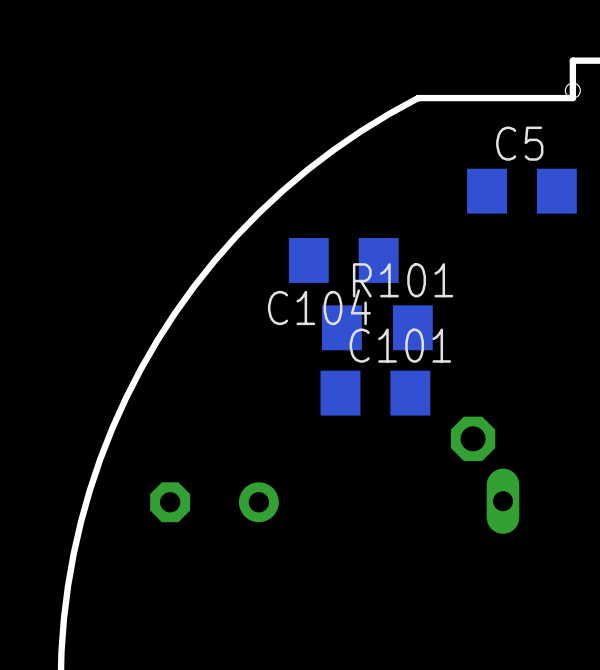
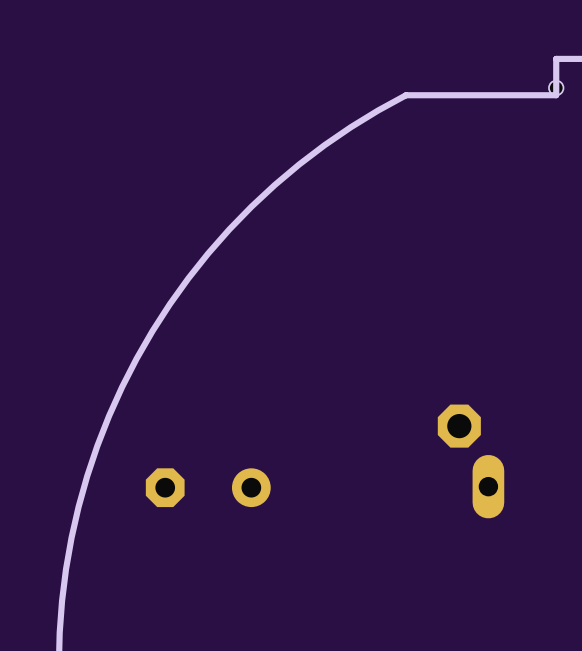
C5: (521, 191) -> none
C104: (343, 260) -> none
R101: (377, 327) -> none
C101: (375, 393) -> none

